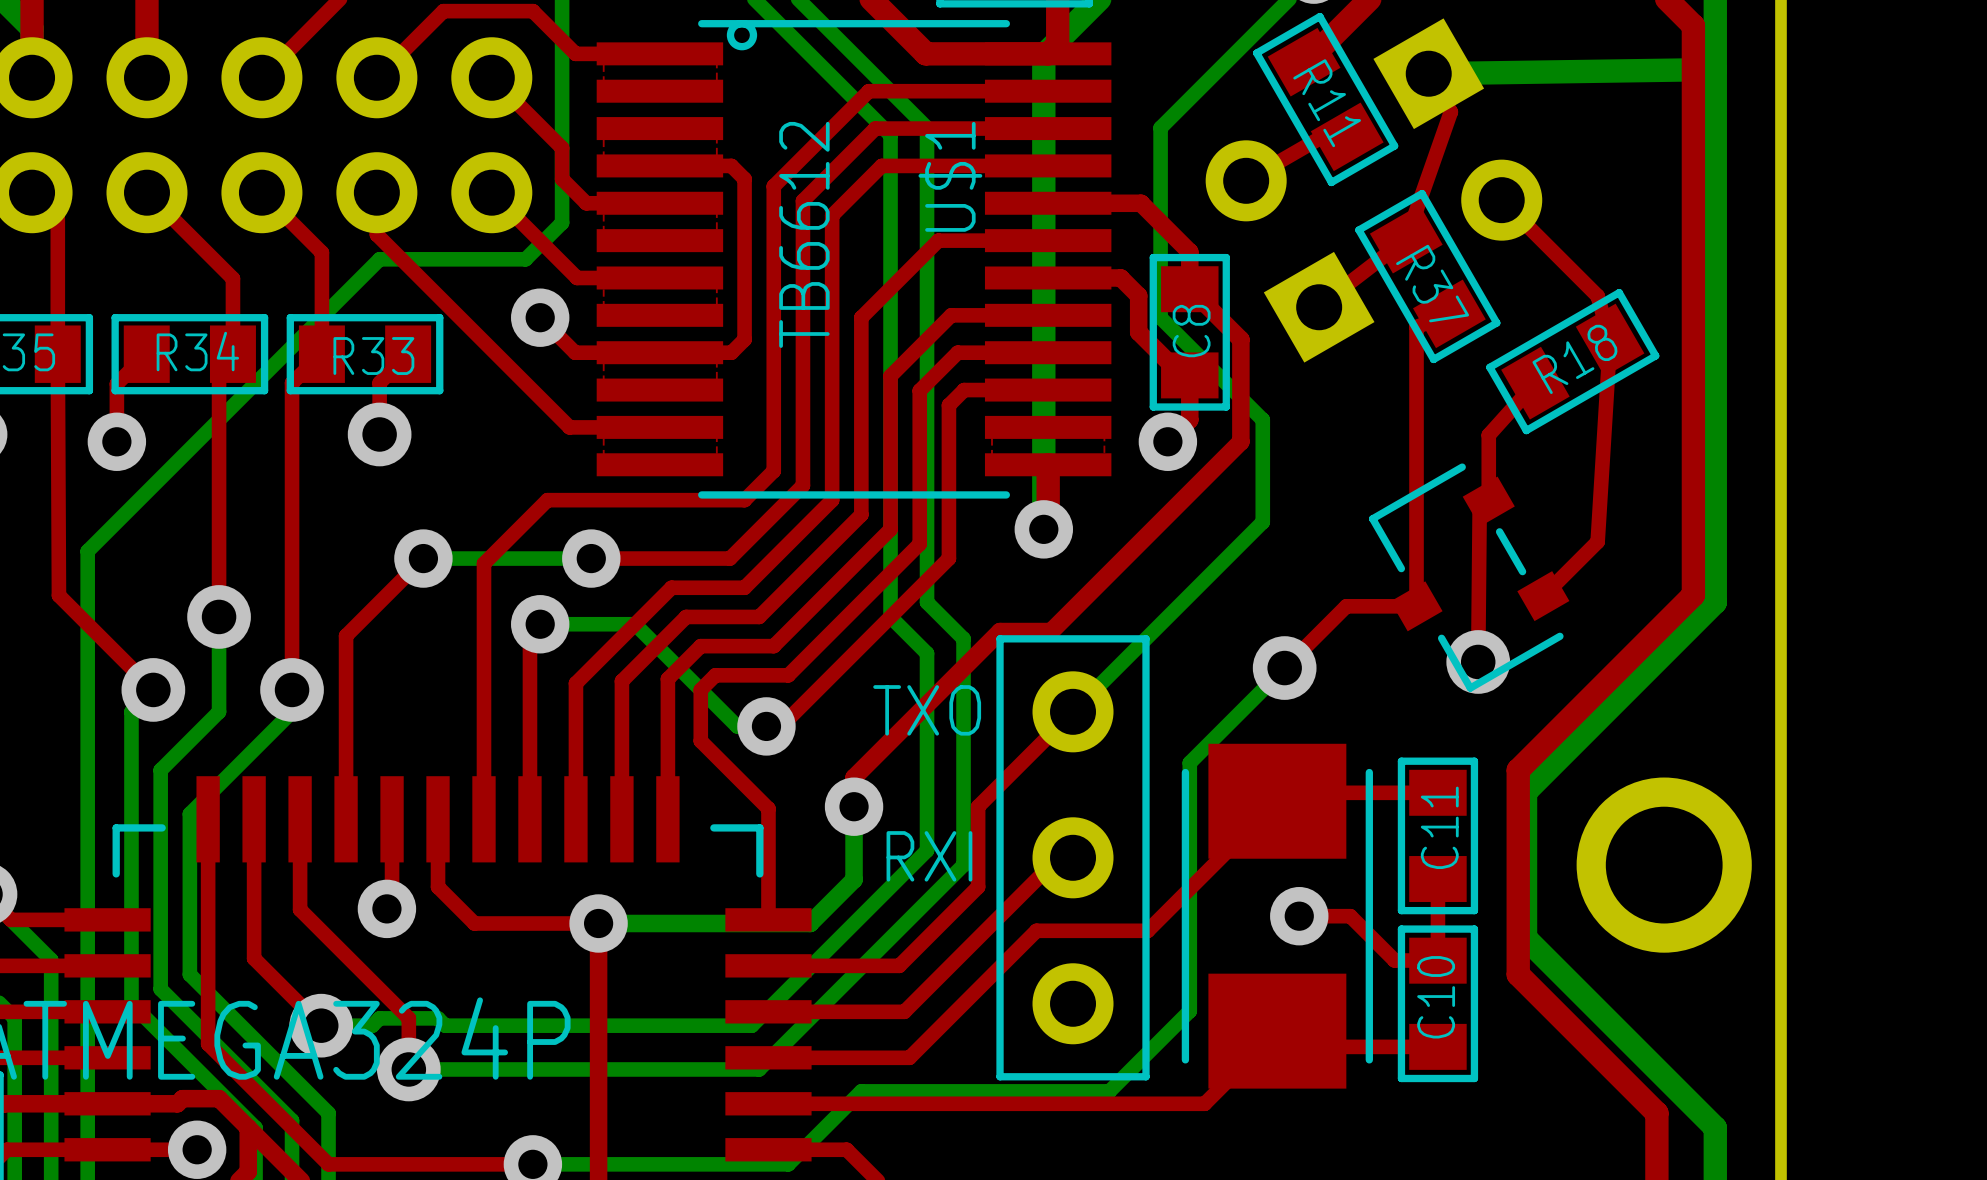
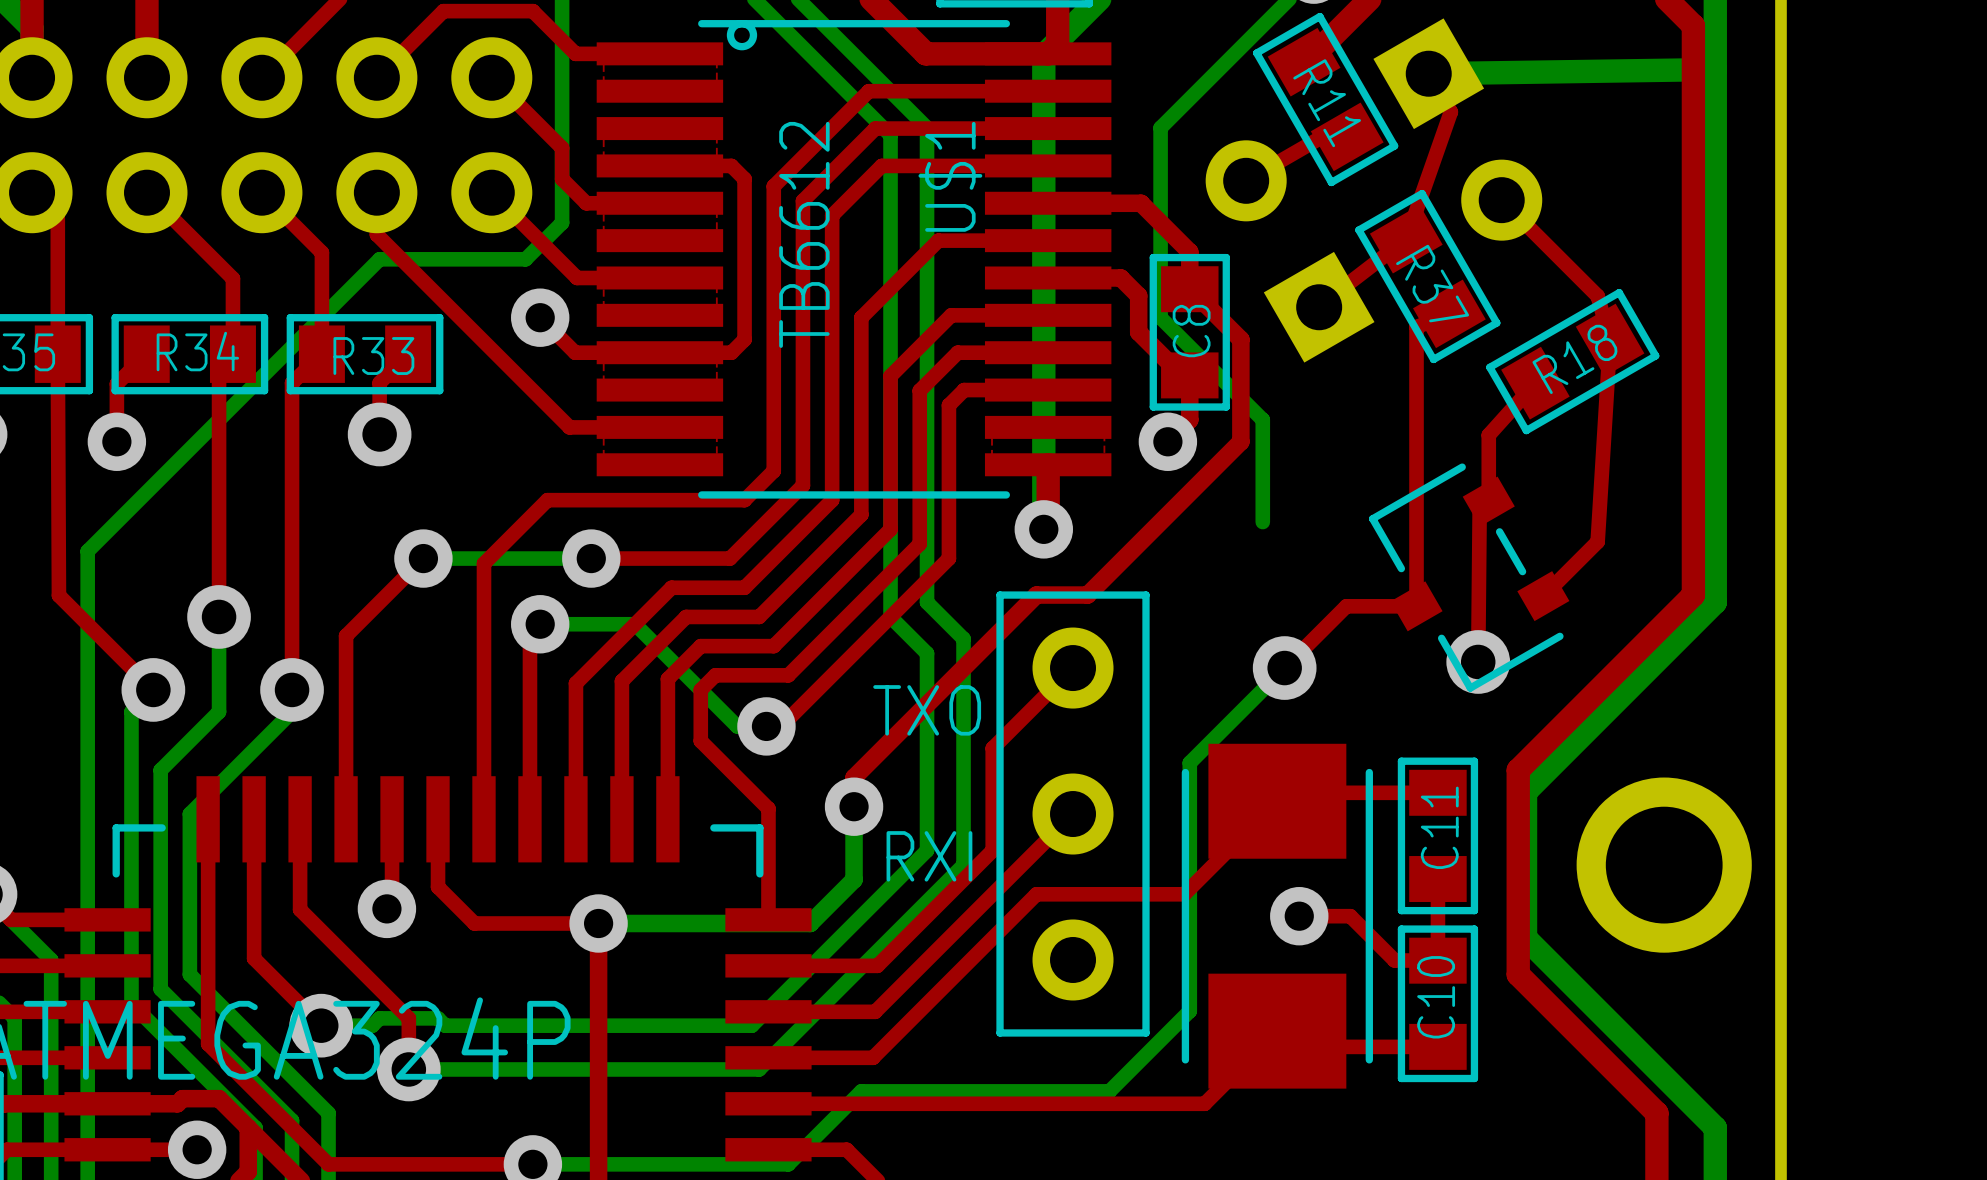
bottom track: (1262, 522) (1073, 711) -> none
top track: (1087, 595) (1051, 631) (1000, 631) -> (1087, 595) (1036, 595) (1000, 631)
top track: (1073, 711) (978, 806) (978, 887) (899, 965) (877, 965) -> (1073, 668) (992, 748) (992, 850) (877, 965)
top track: (1073, 857) (1058, 857) (904, 1011) (875, 1011) -> (1073, 814) (875, 1011)
part position: (1073, 857) -> (1073, 814)
top track: (1184, 894) (1147, 930) (1036, 930) (909, 1057) (873, 1057) -> (1184, 894) (1036, 894) (873, 1057)

